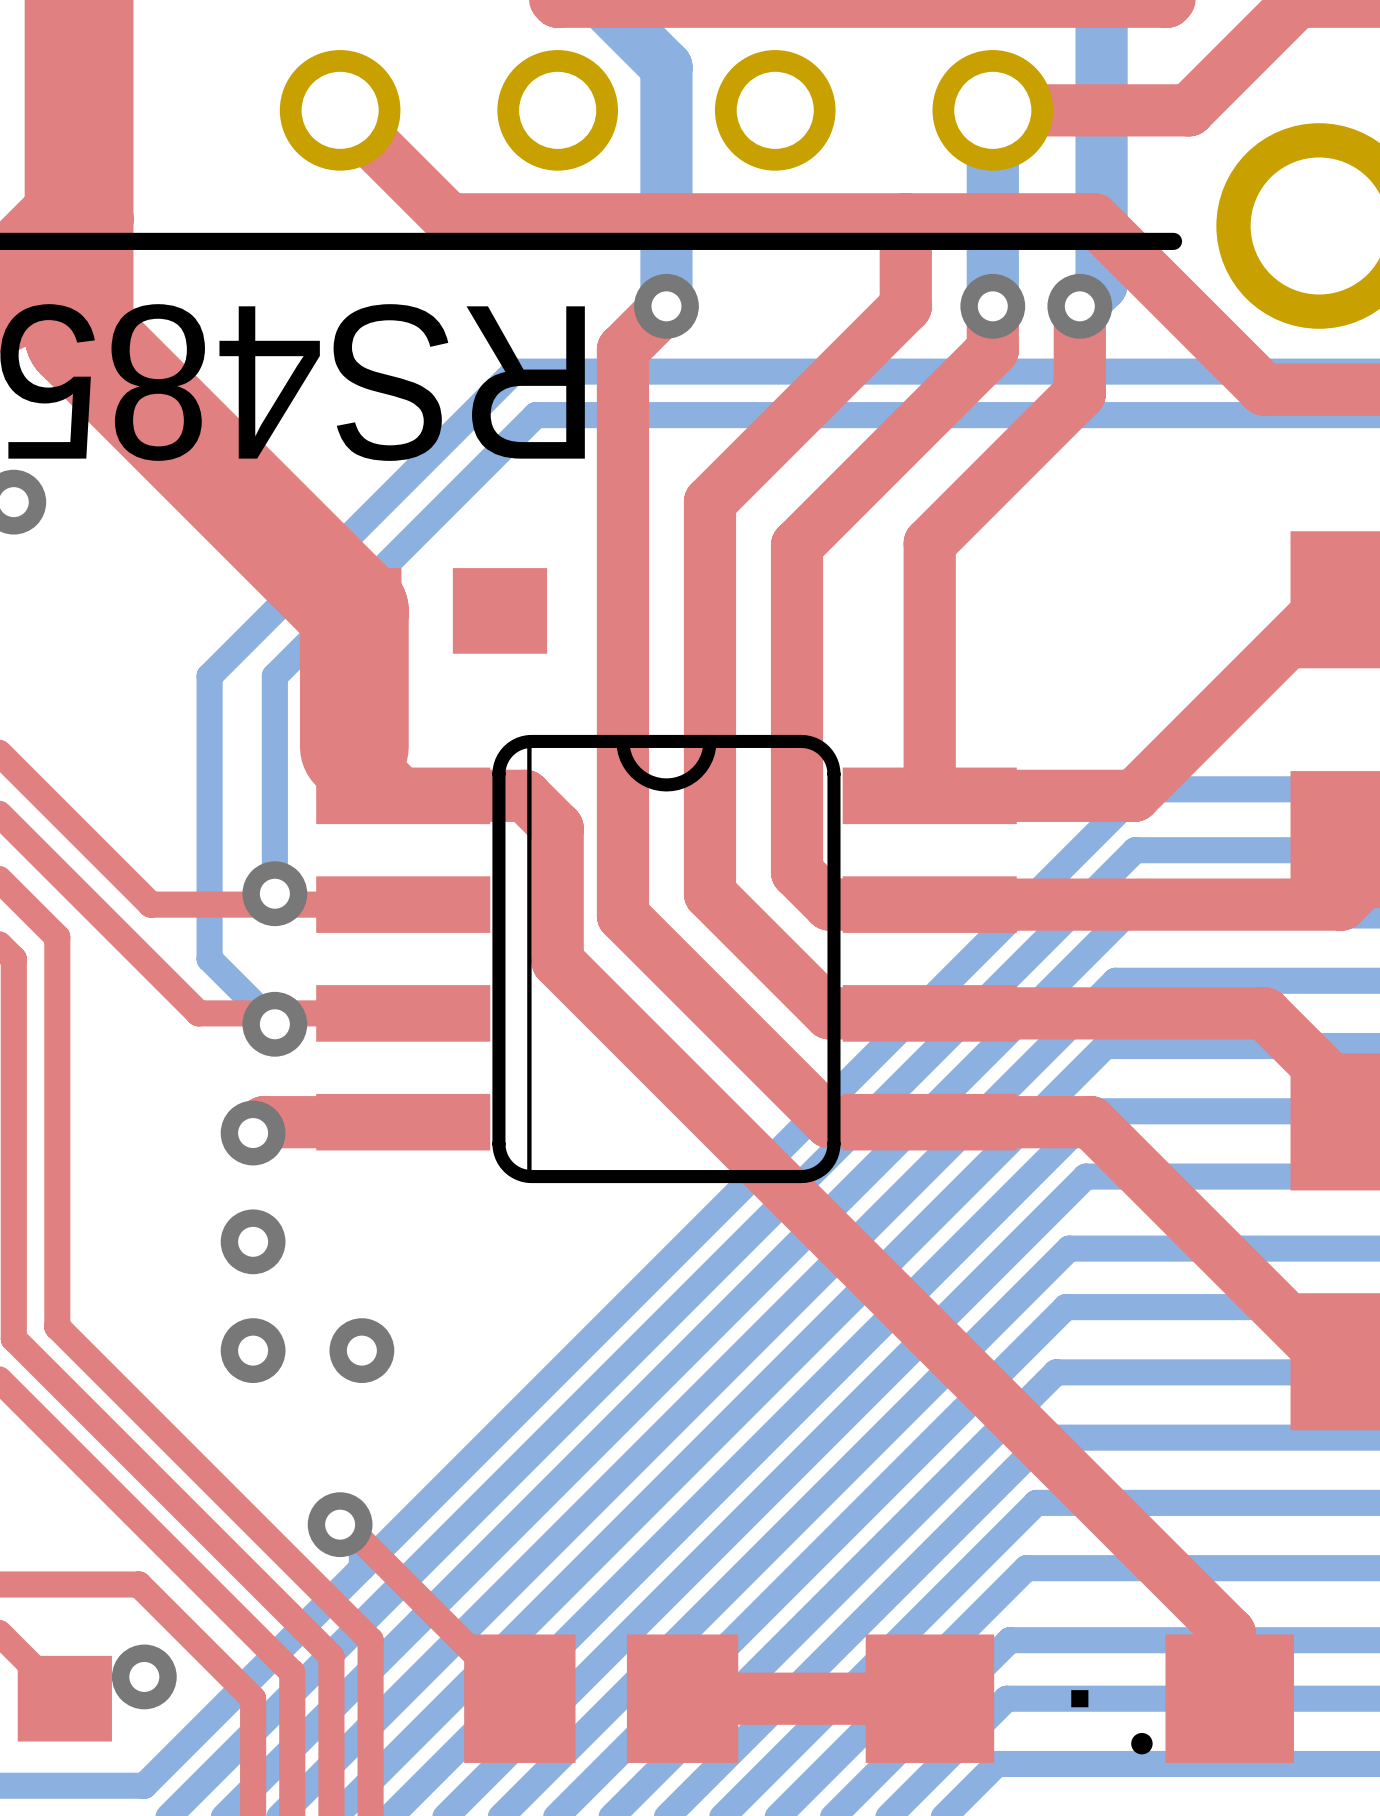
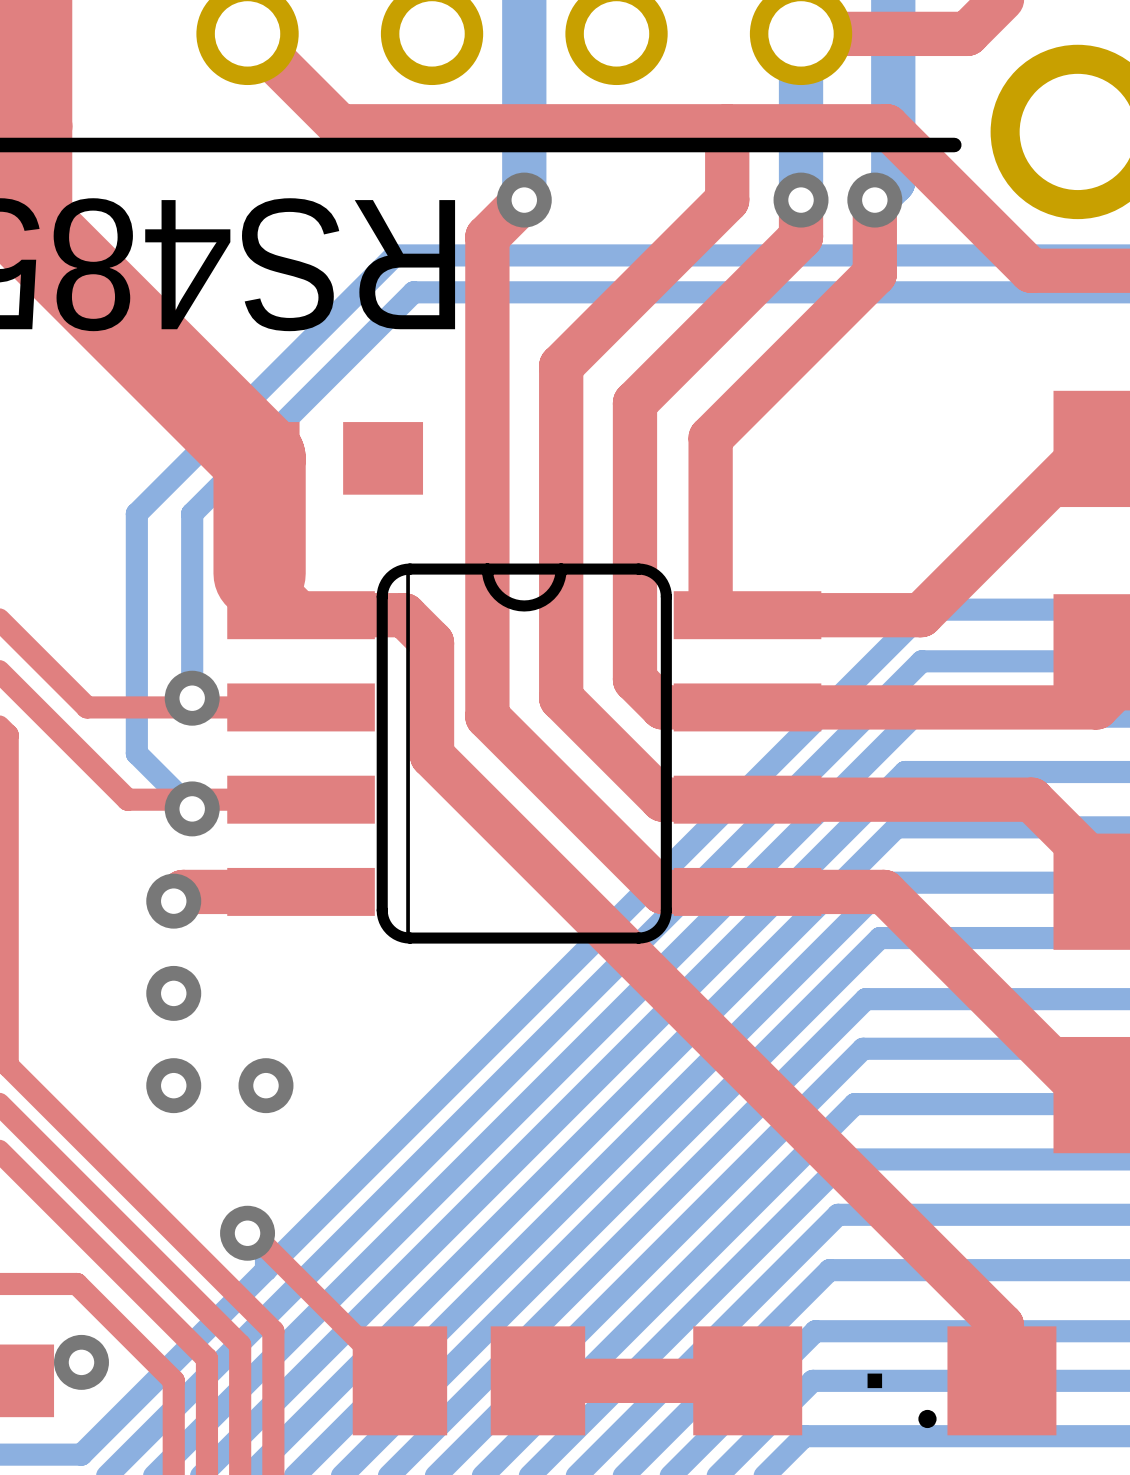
top track: (929, 543) (929, 795) -> (747, 401) (710, 438) (710, 615) (747, 615)

